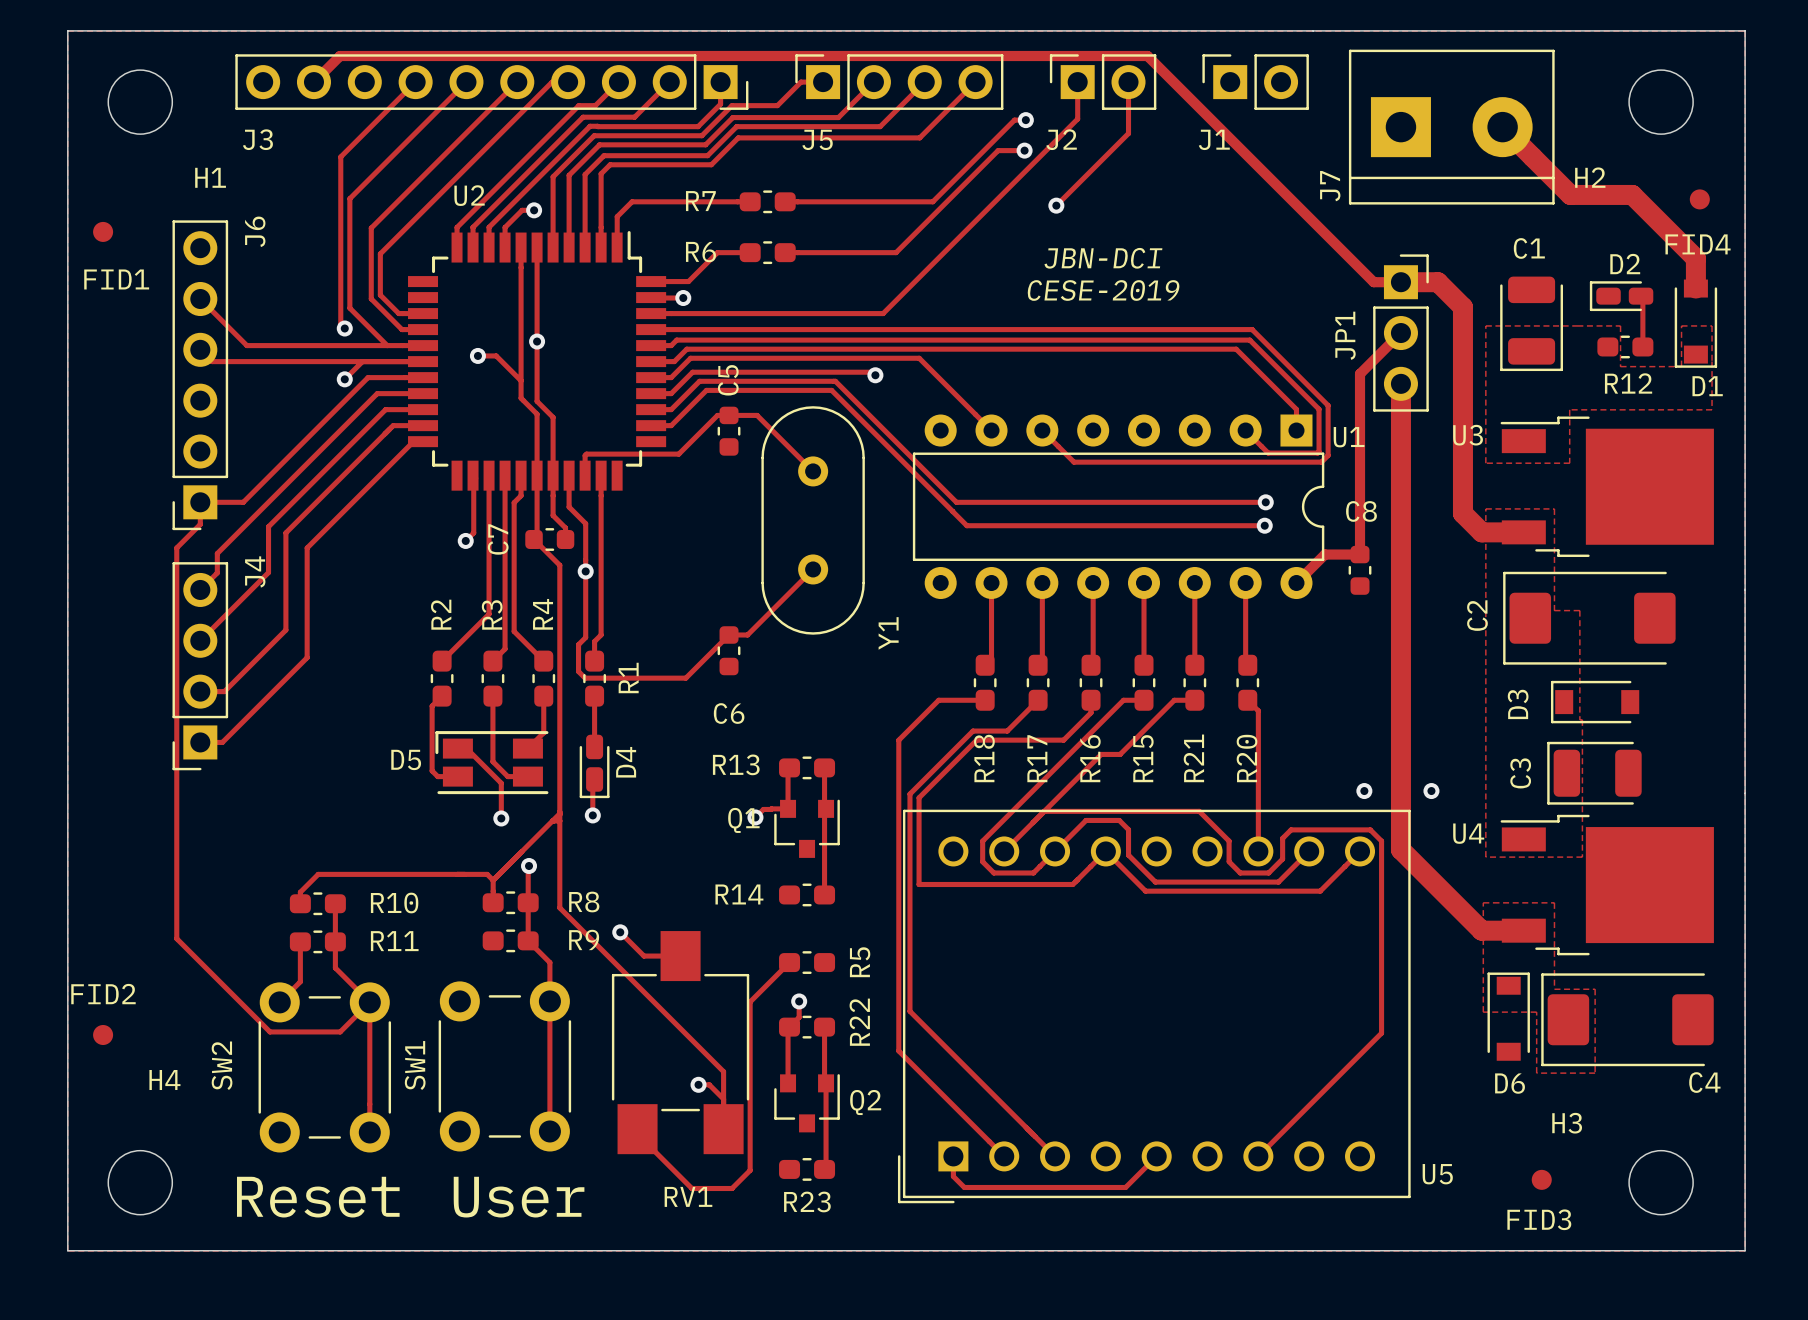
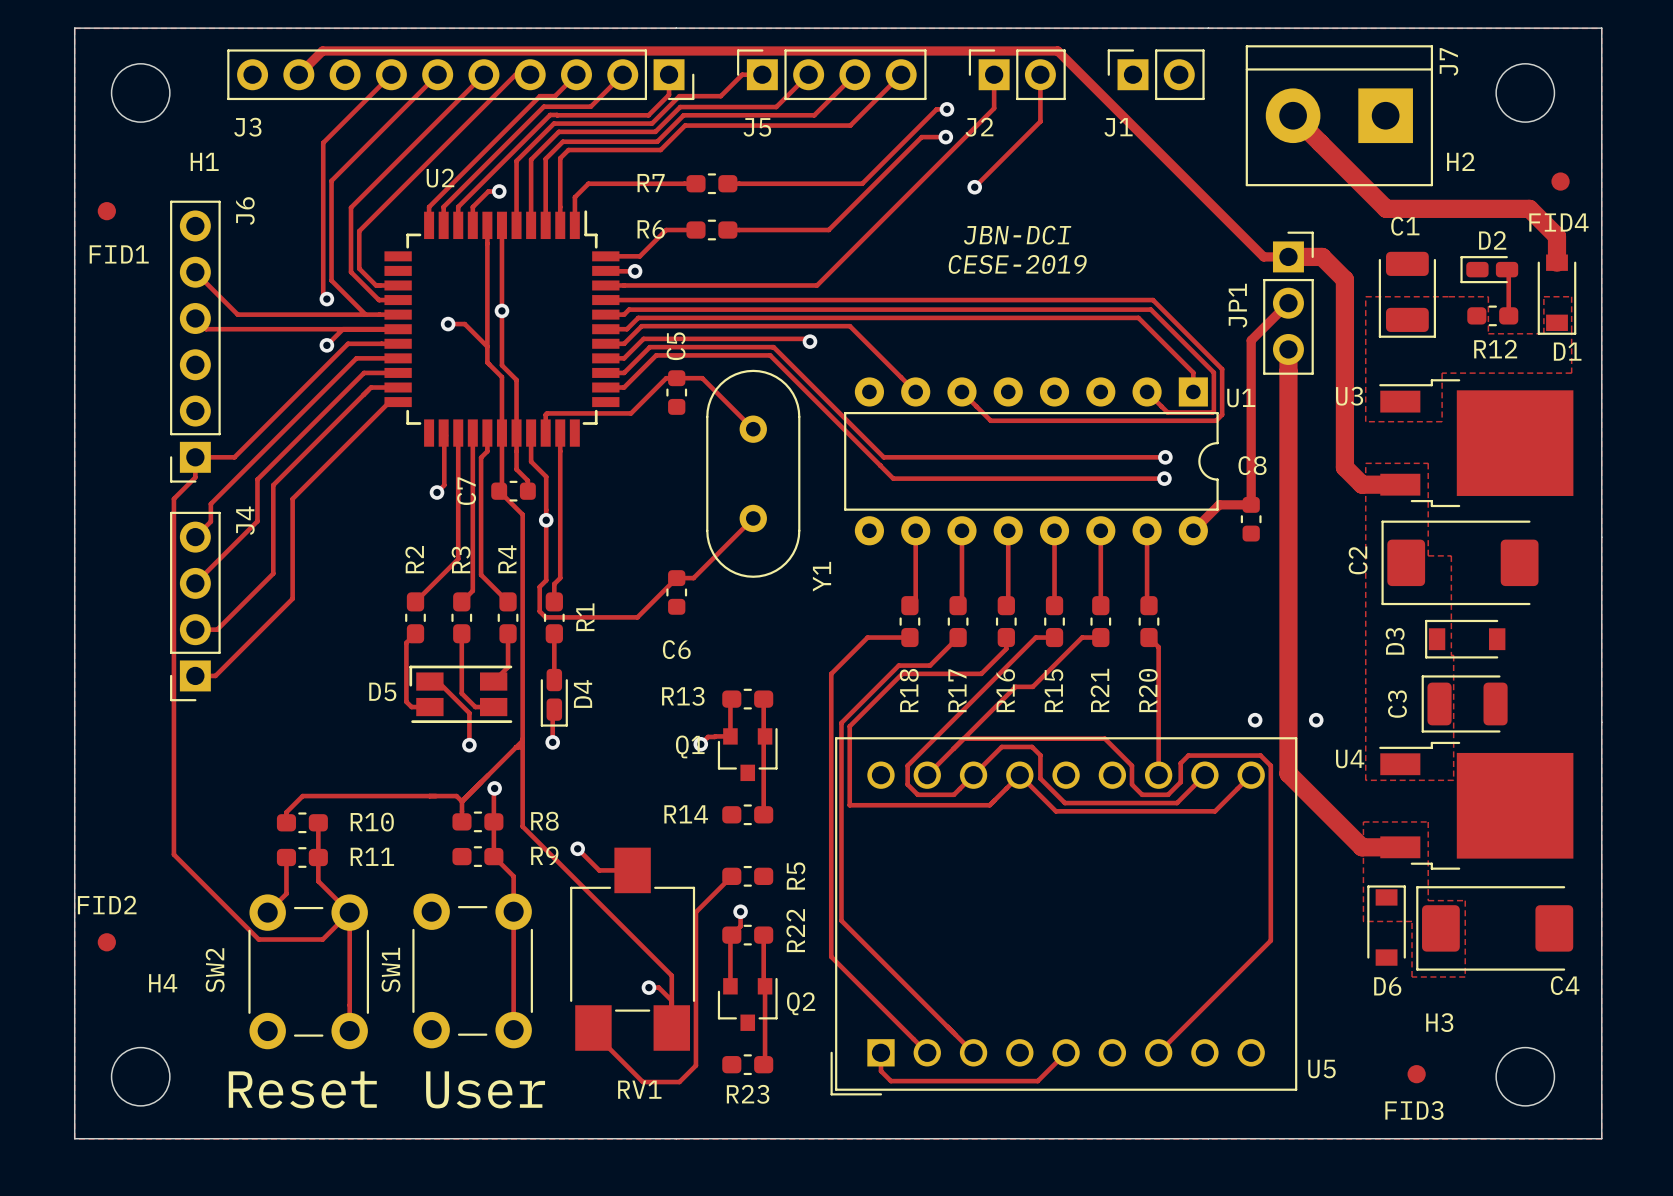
J7 rotation: 0° (1451, 127) -> 180° (1339, 115)
track: (1502, 127) (1570, 194) (1632, 194) (1695, 259) -> (1293, 115) (1386, 208) (1529, 208) (1556, 236)

